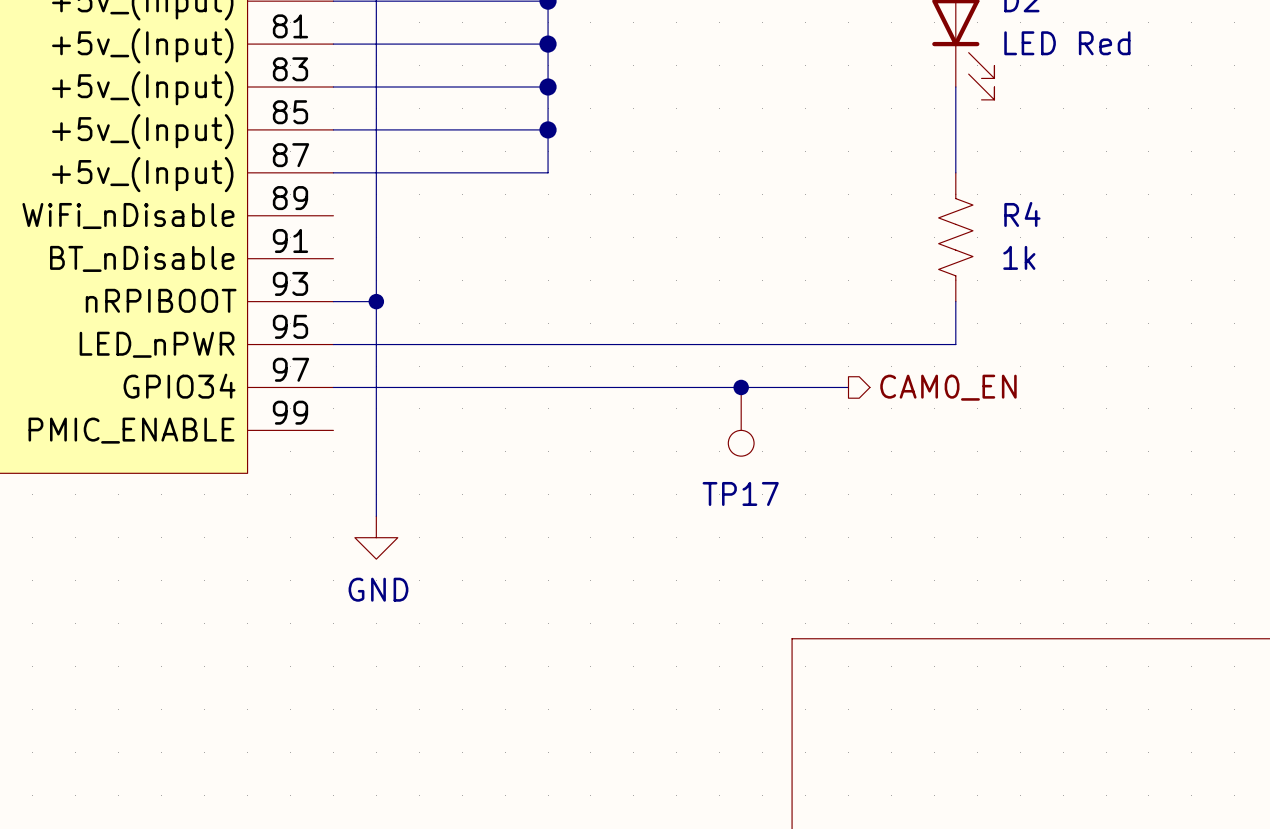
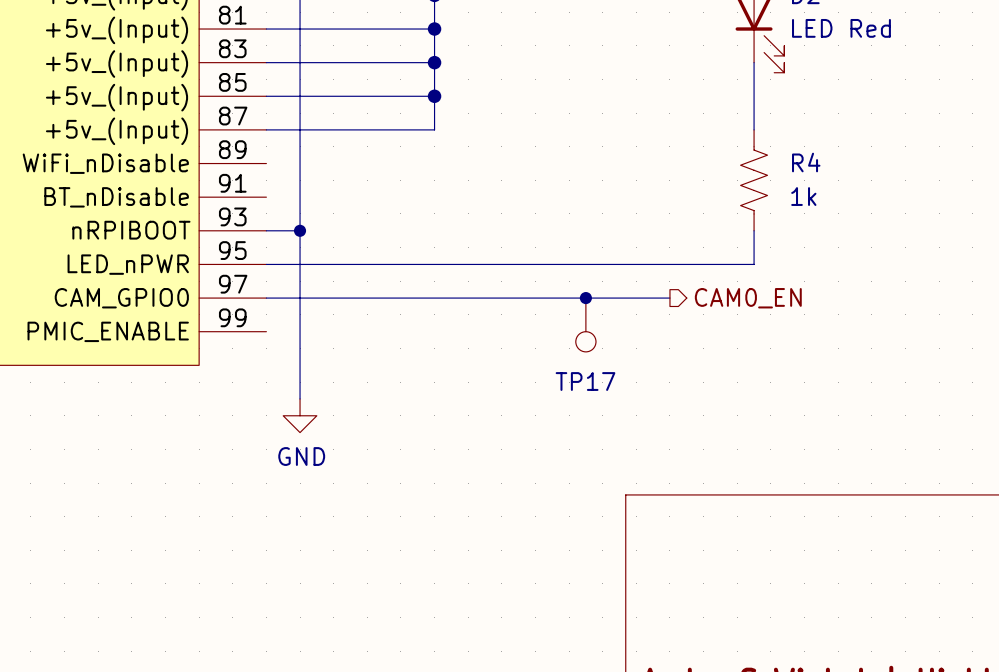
part pin name: GPIO34 (179, 386) -> CAM_GPIO0 (121, 298)

